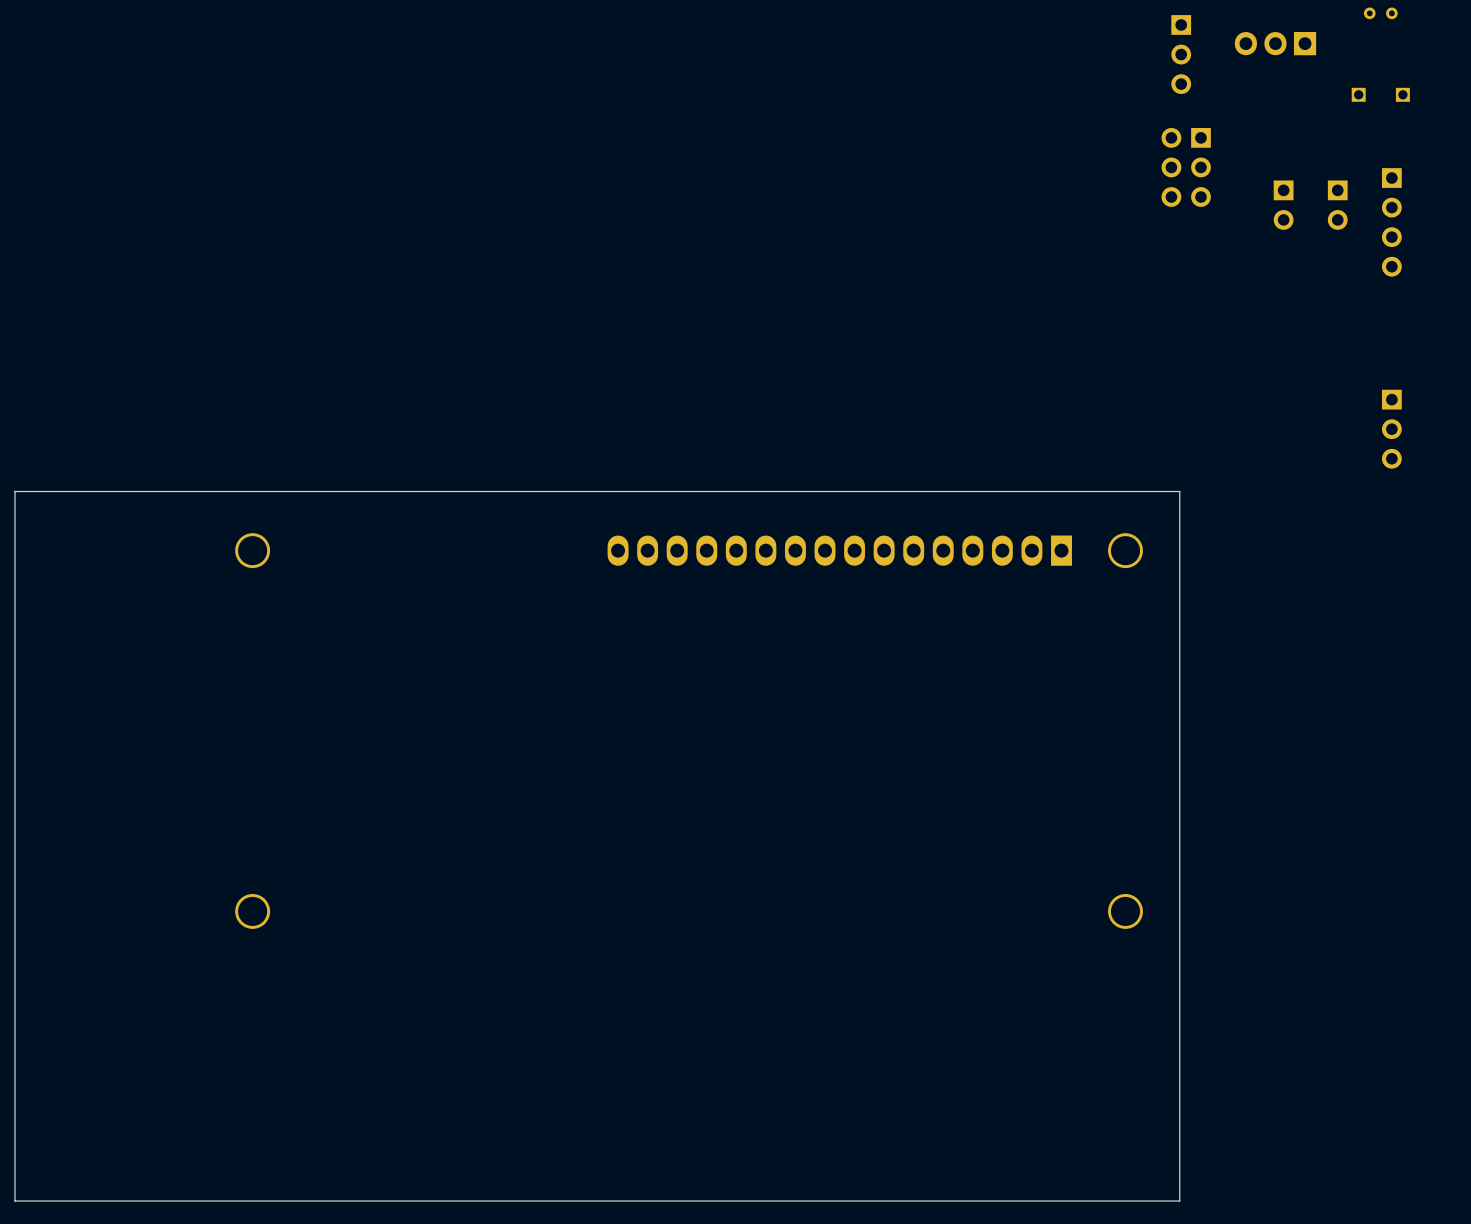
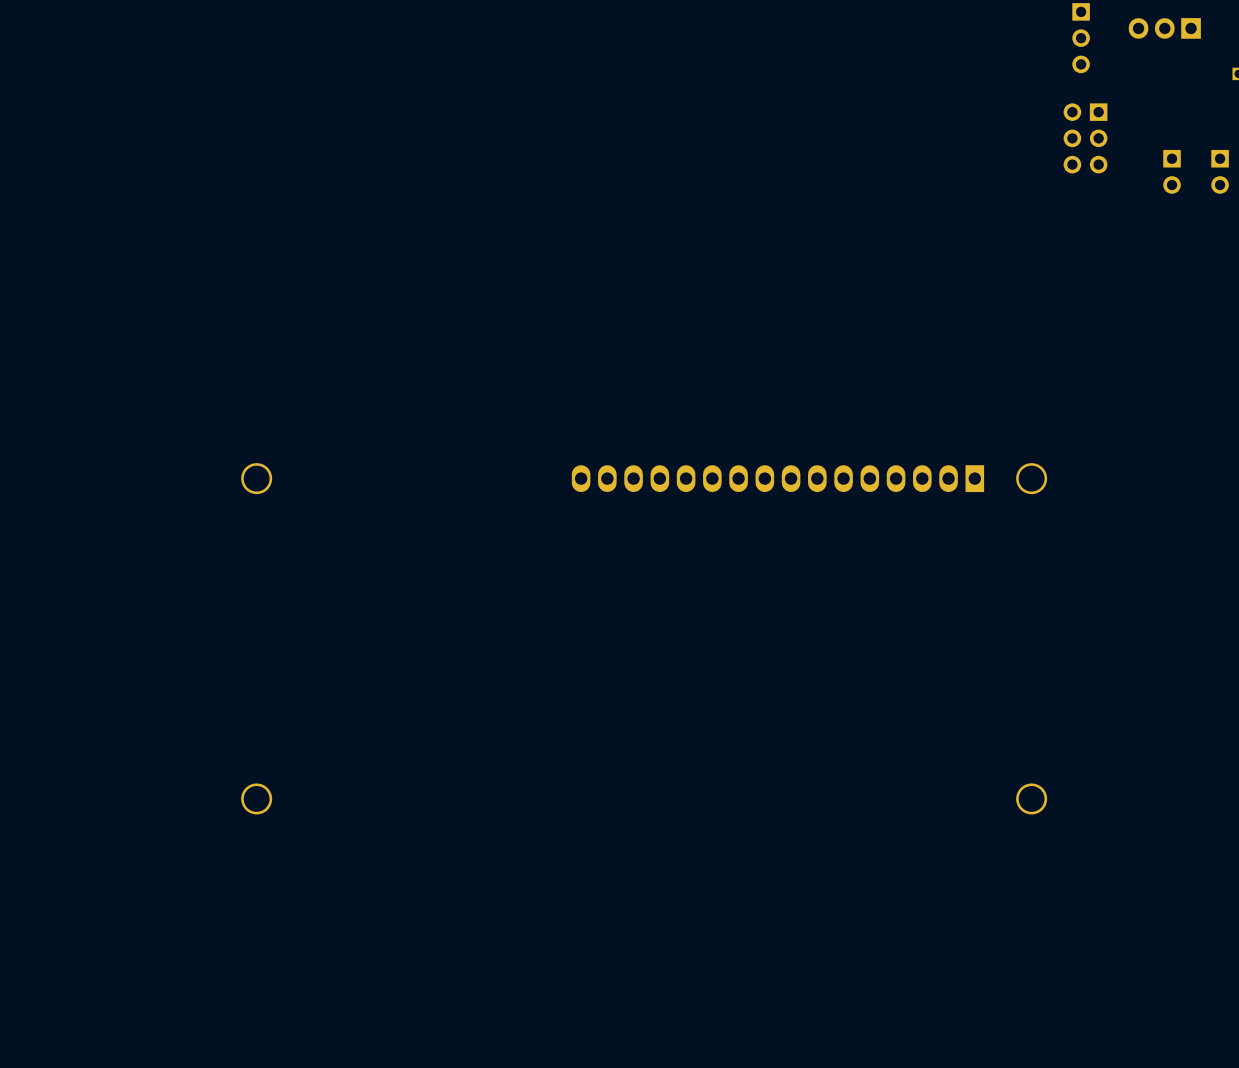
board edge: (1179, 491) (15, 491) (15, 1201) (1179, 1201) (1179, 491) -> none

